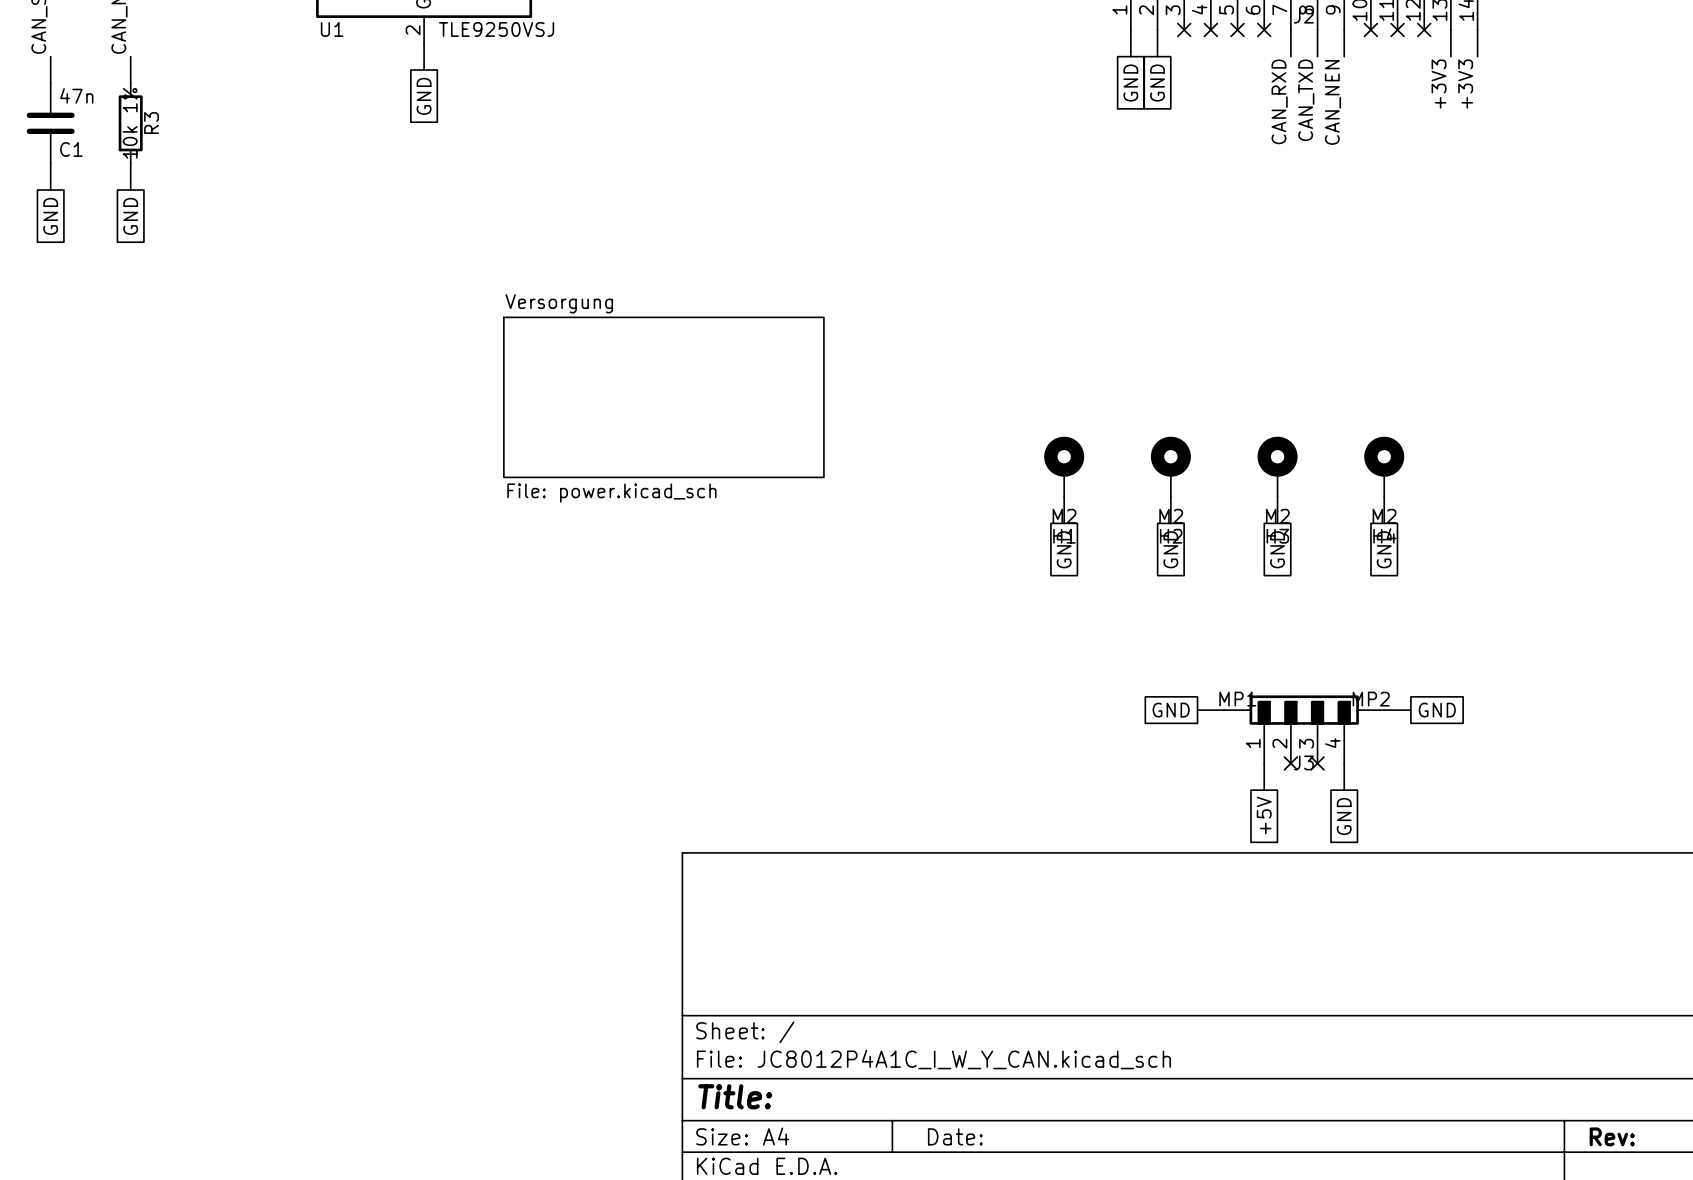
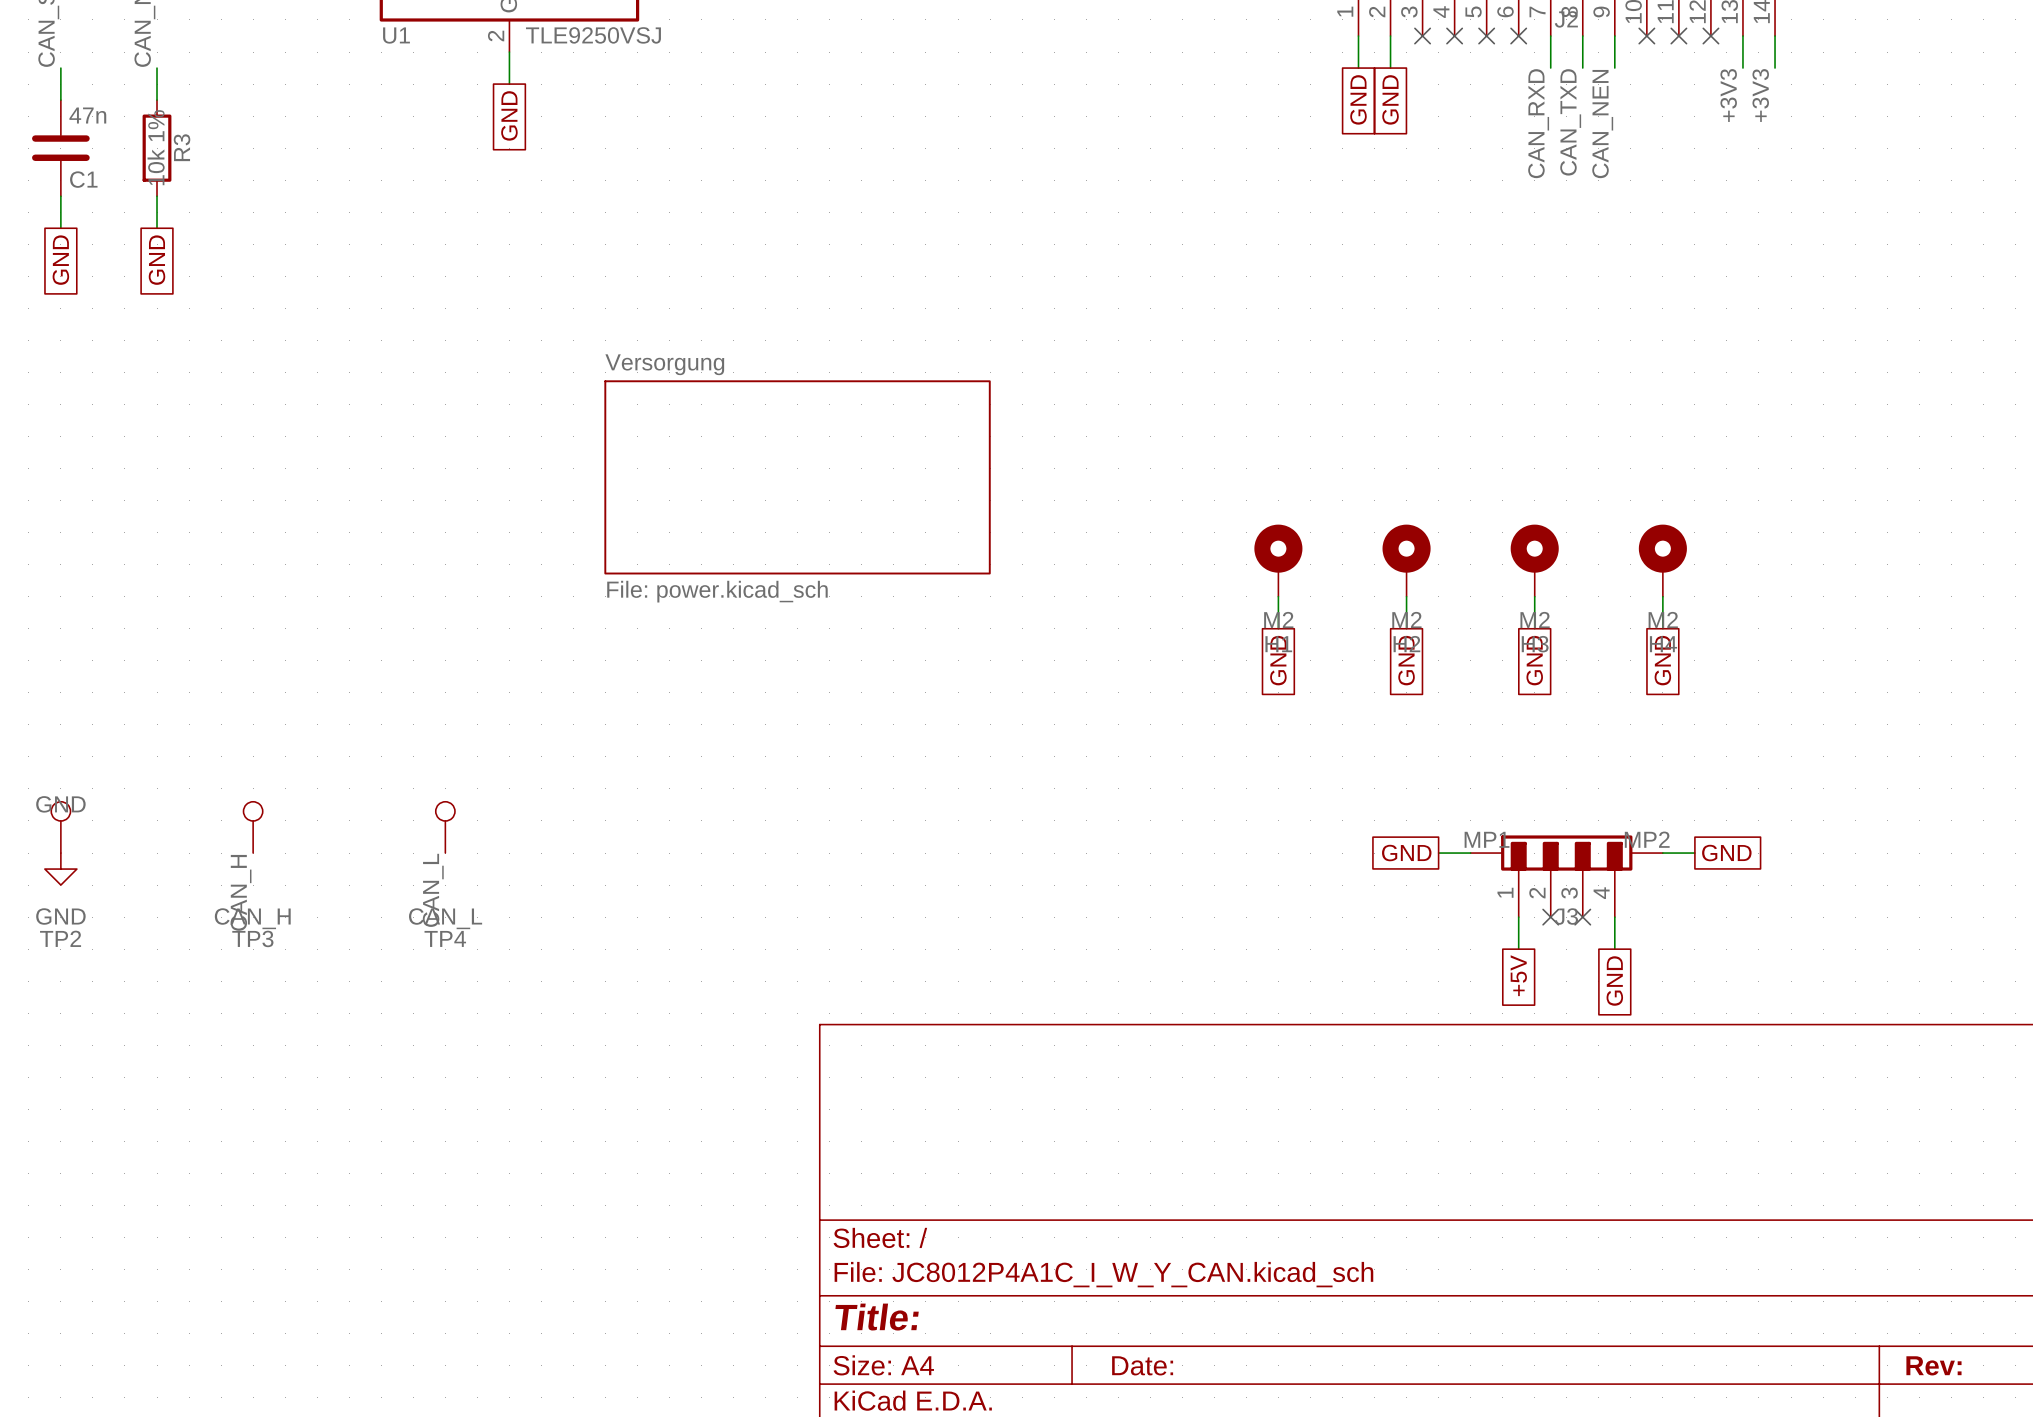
TP2: none -> GND (60, 827)
TP3: none -> CAN_H (253, 827)
TP4: none -> CAN_L (445, 827)
power symbol: none -> GND (60, 869)
label: none -> CAN_L (433, 890)
label: none -> CAN_H (241, 892)

